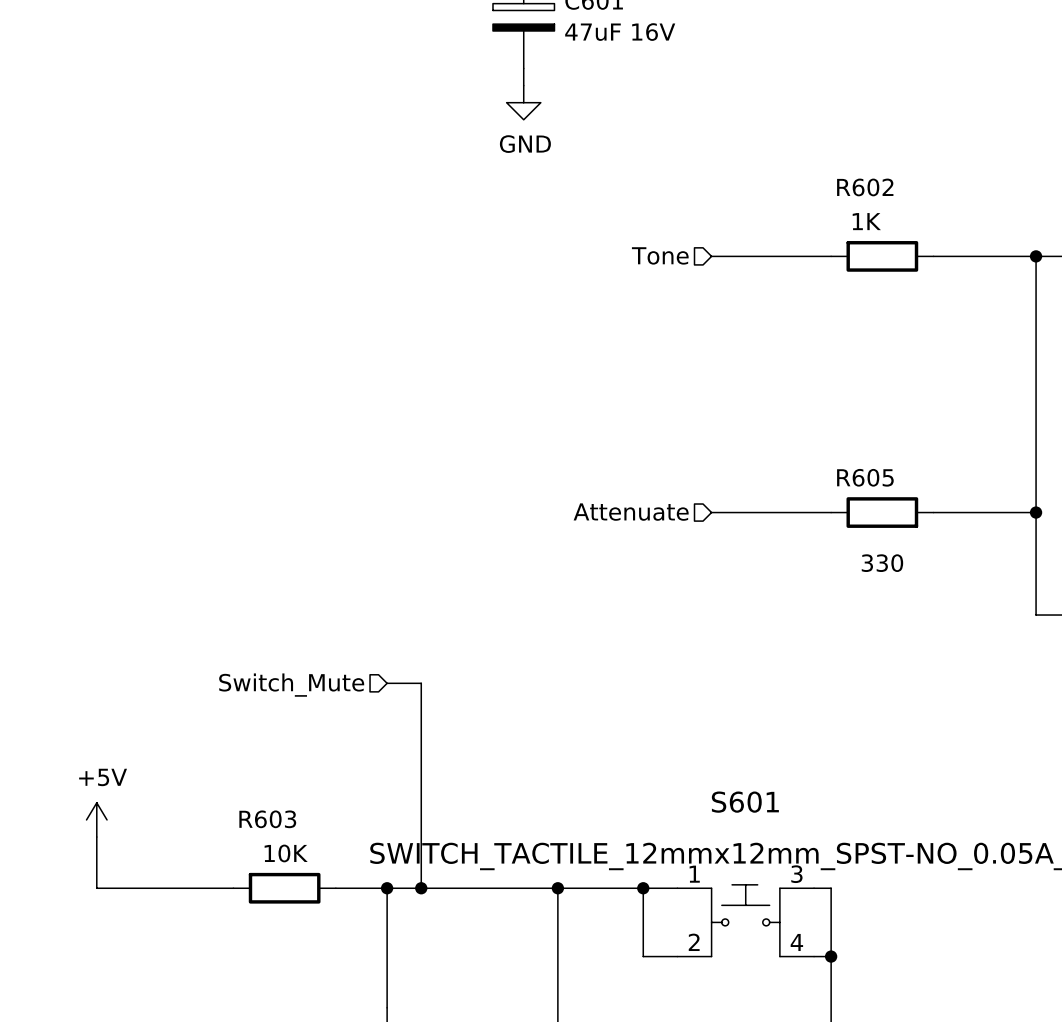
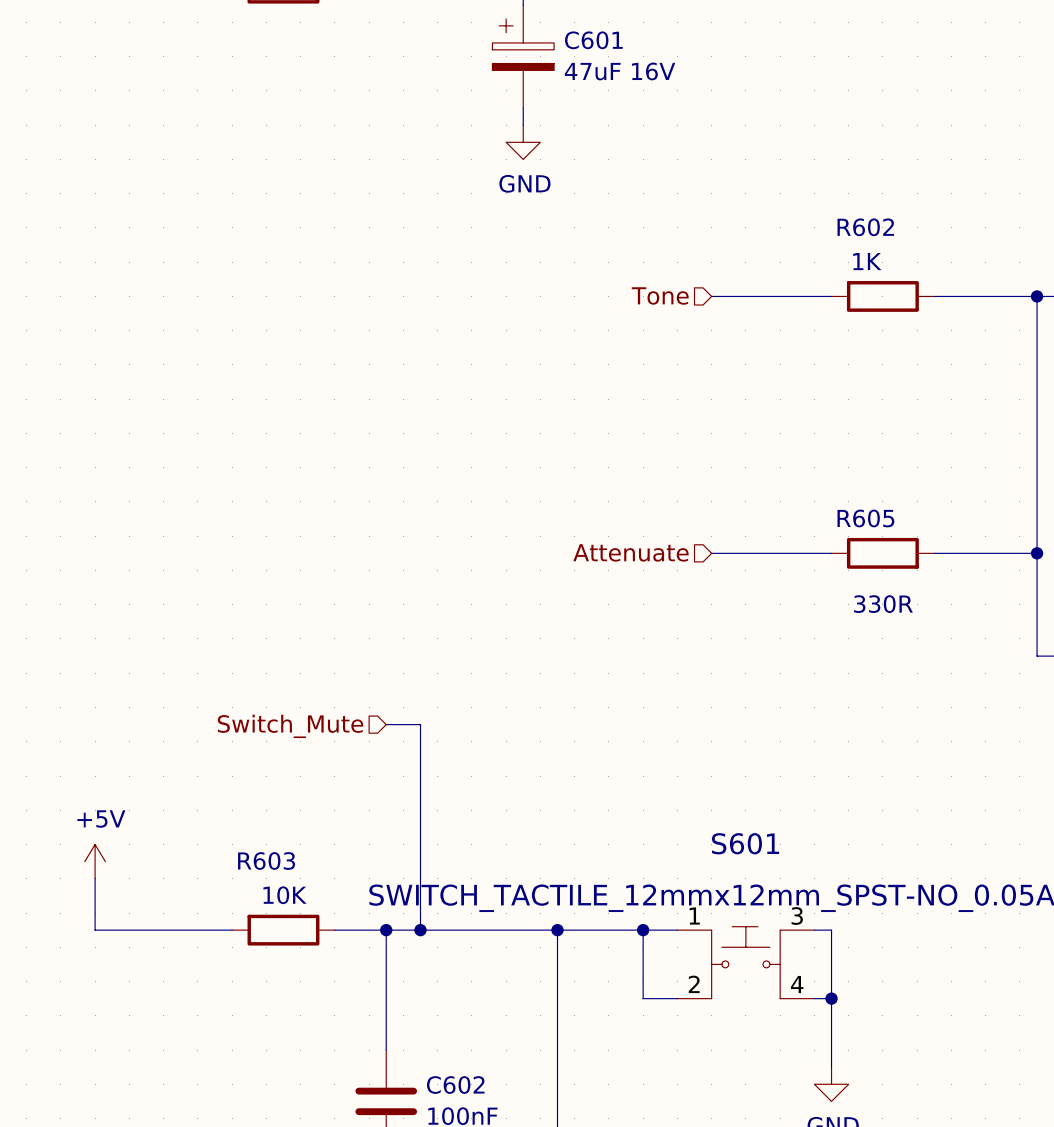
R605 value: 330 (882, 563) -> 330R (883, 604)

